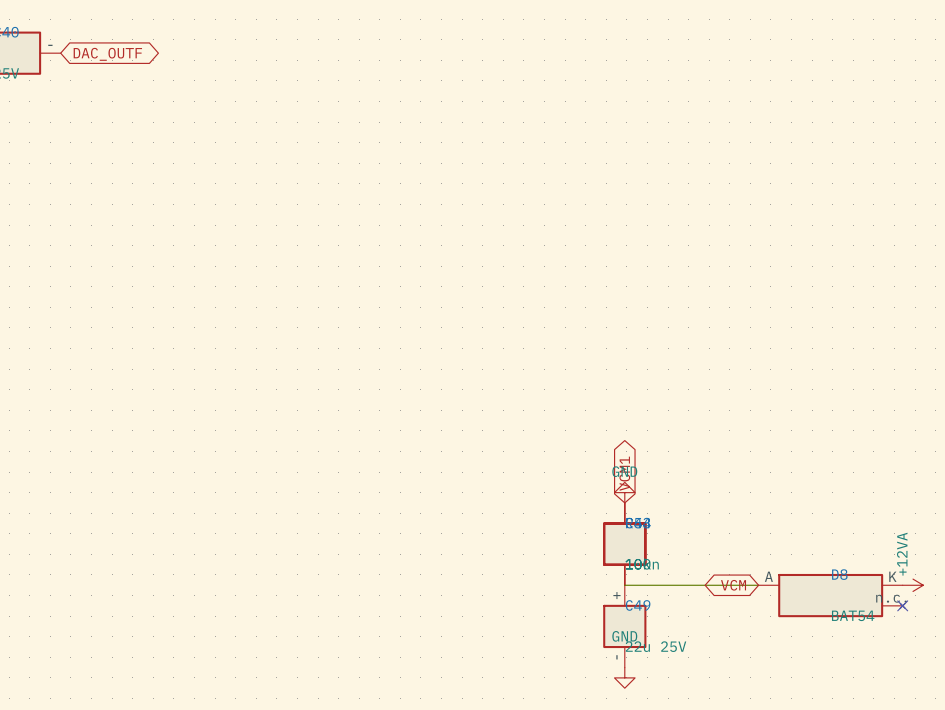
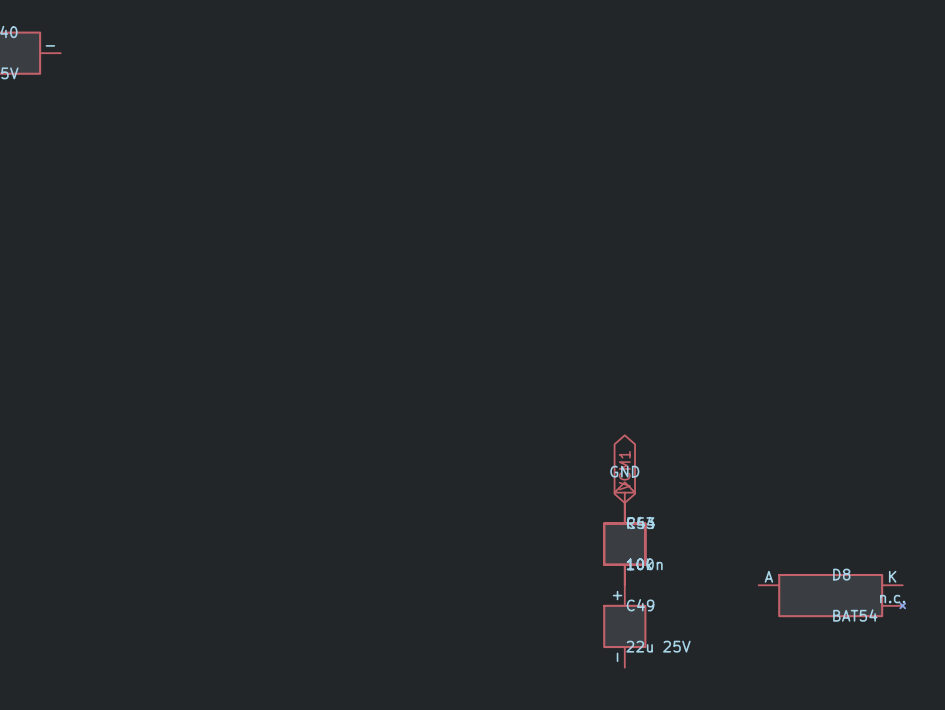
global label: DAC_OUTF (107, 54) -> none
wire: (624, 585) (758, 585) -> none
global label: VCM (733, 585) -> none
power symbol: +12VA (913, 585) -> none
no-connect mark: (902, 605) -> none
power symbol: GND (624, 677) -> none

